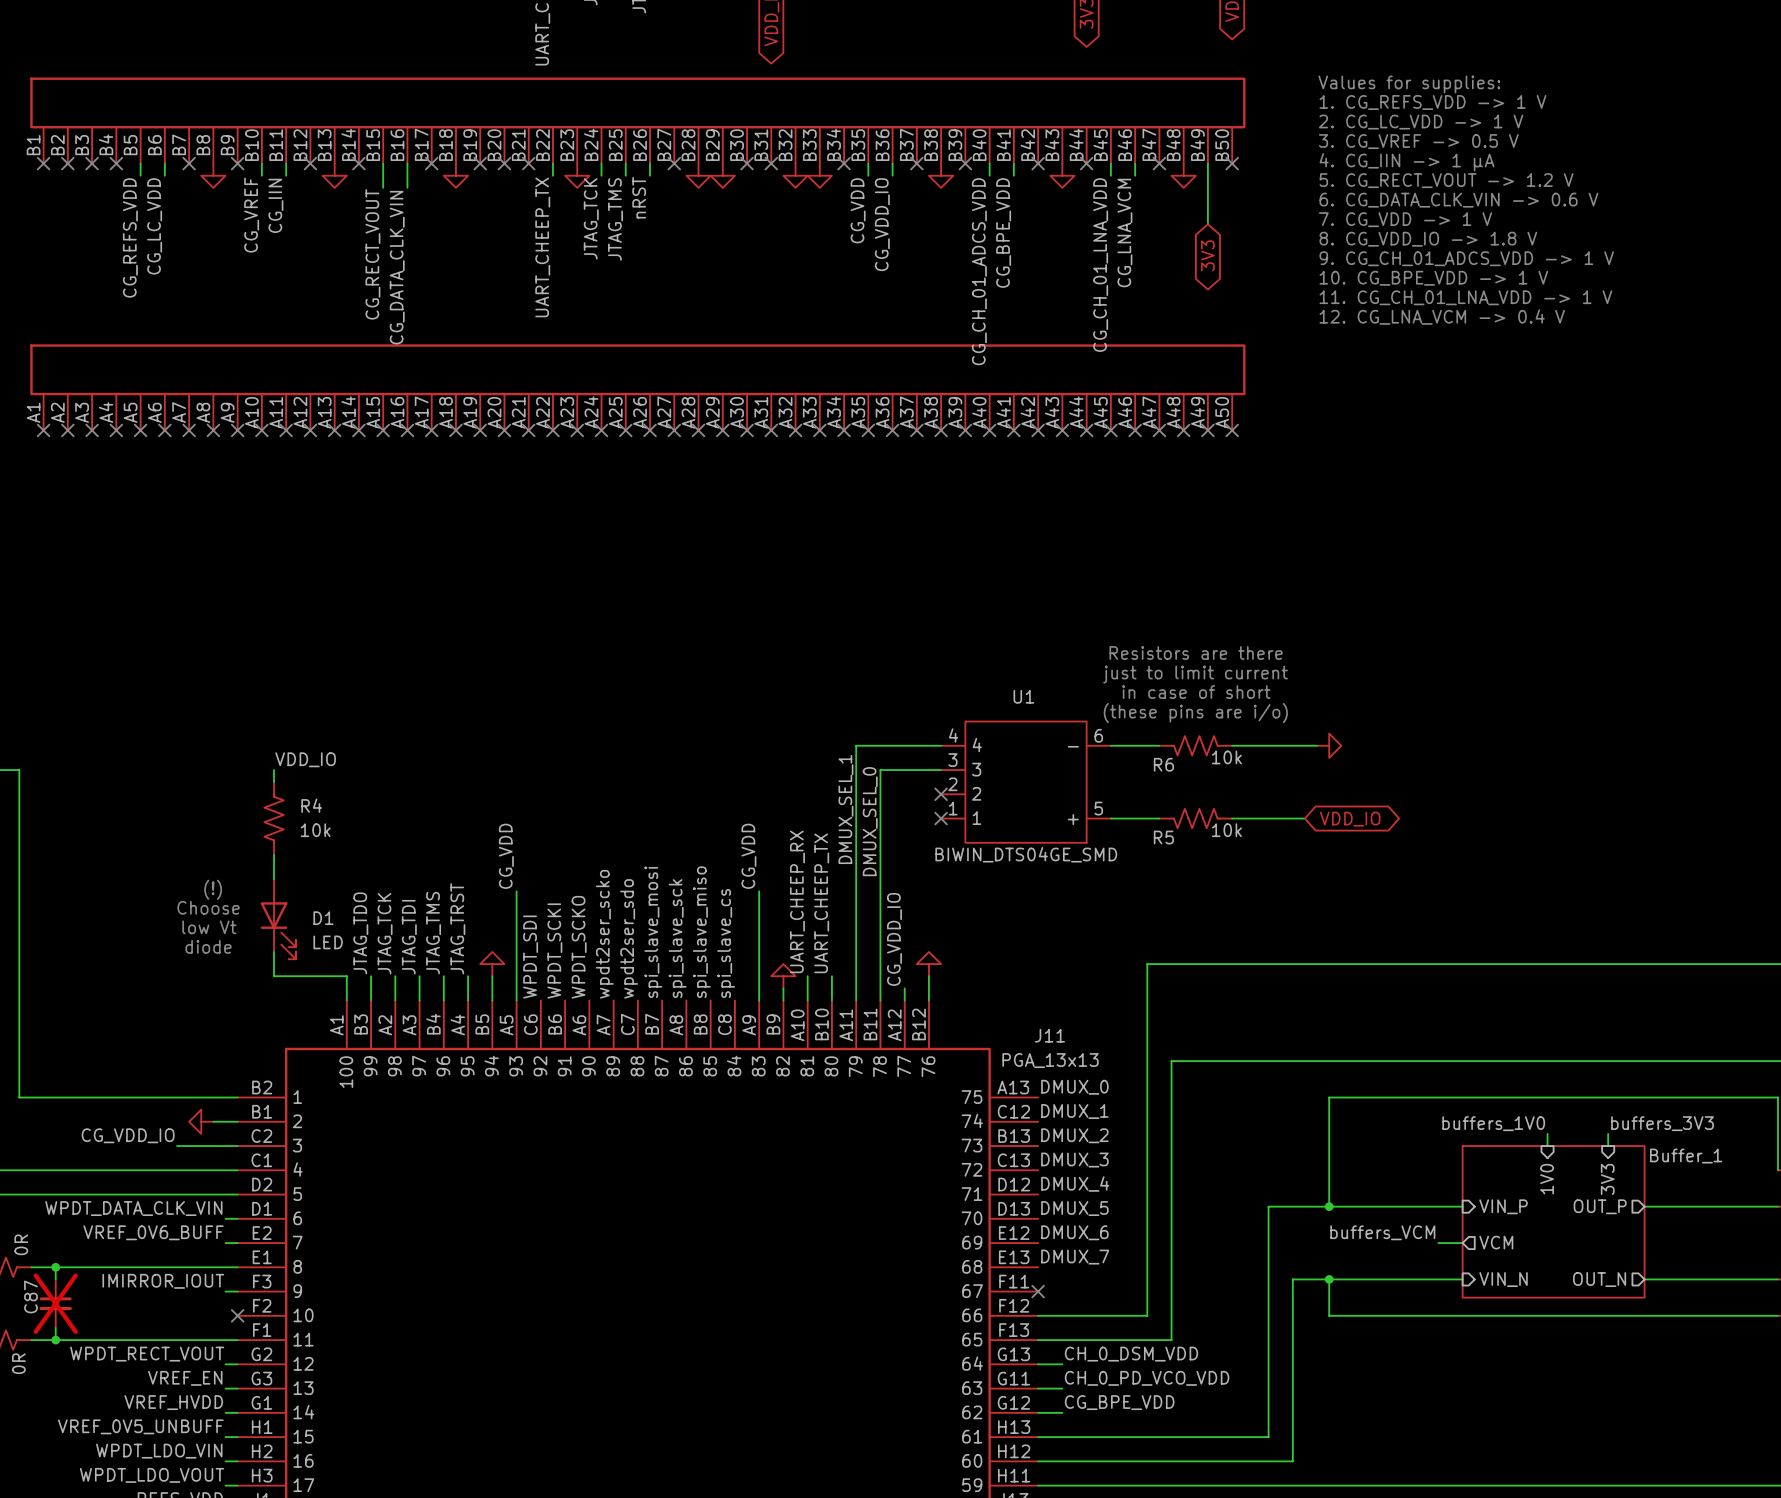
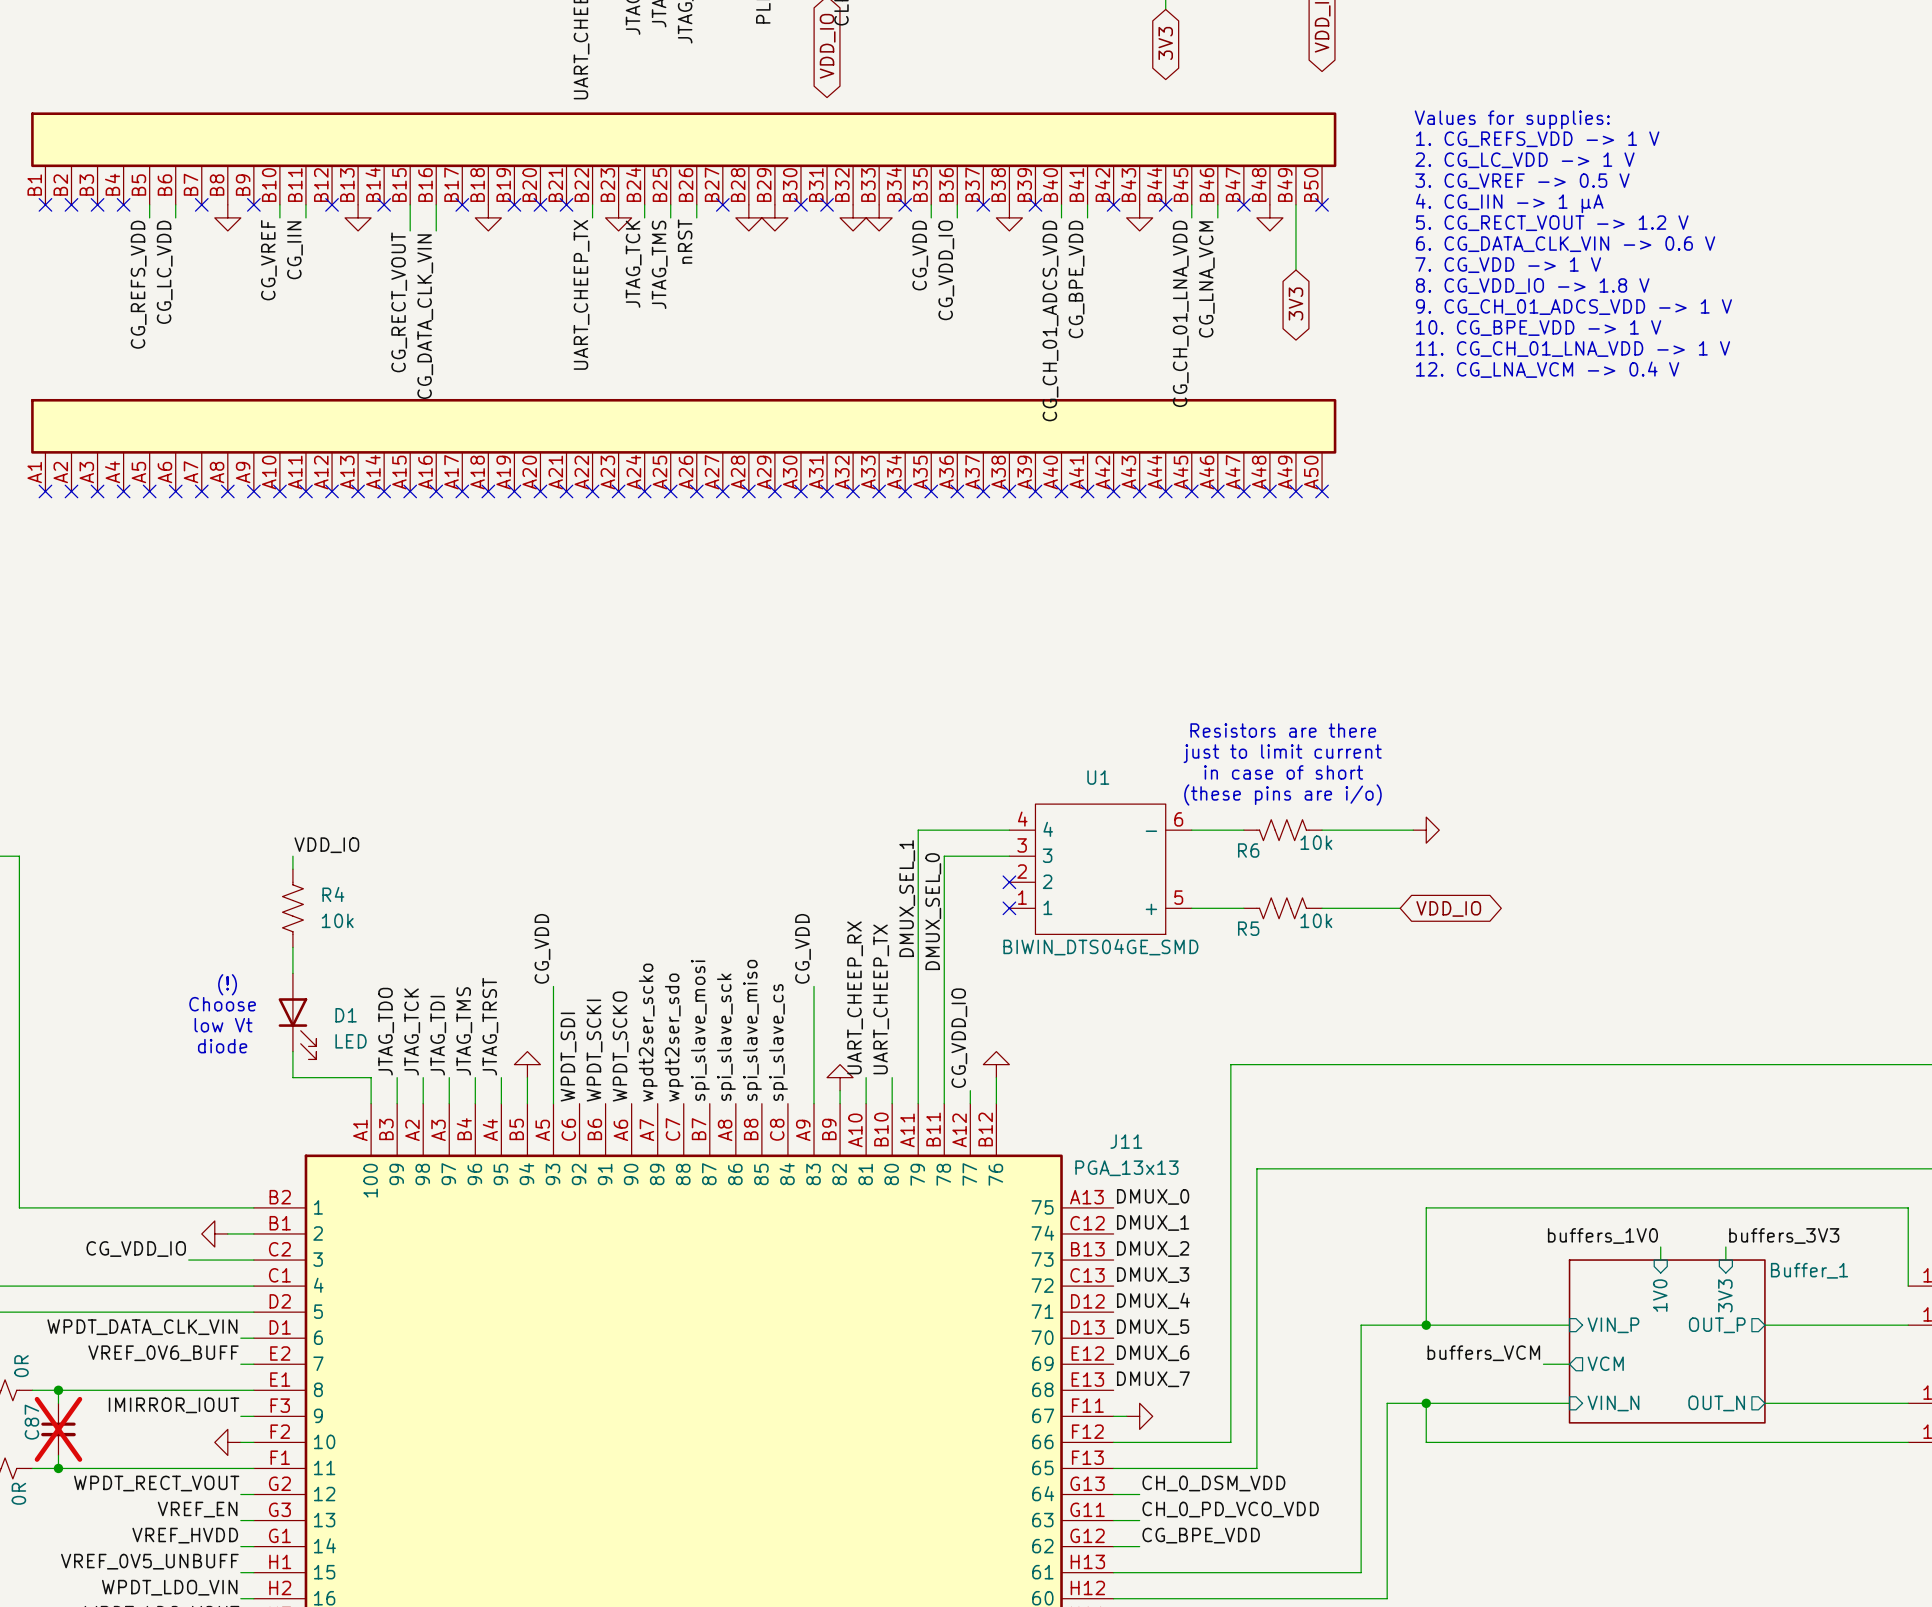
wire: none -> (1113, 1416) (1126, 1416)
no-connect mark: (1038, 1291) -> none
power symbol: none -> (1139, 1416)
power symbol: none -> (227, 1442)
wire: none -> (240, 1442) (253, 1442)
no-connect mark: (237, 1315) -> none

